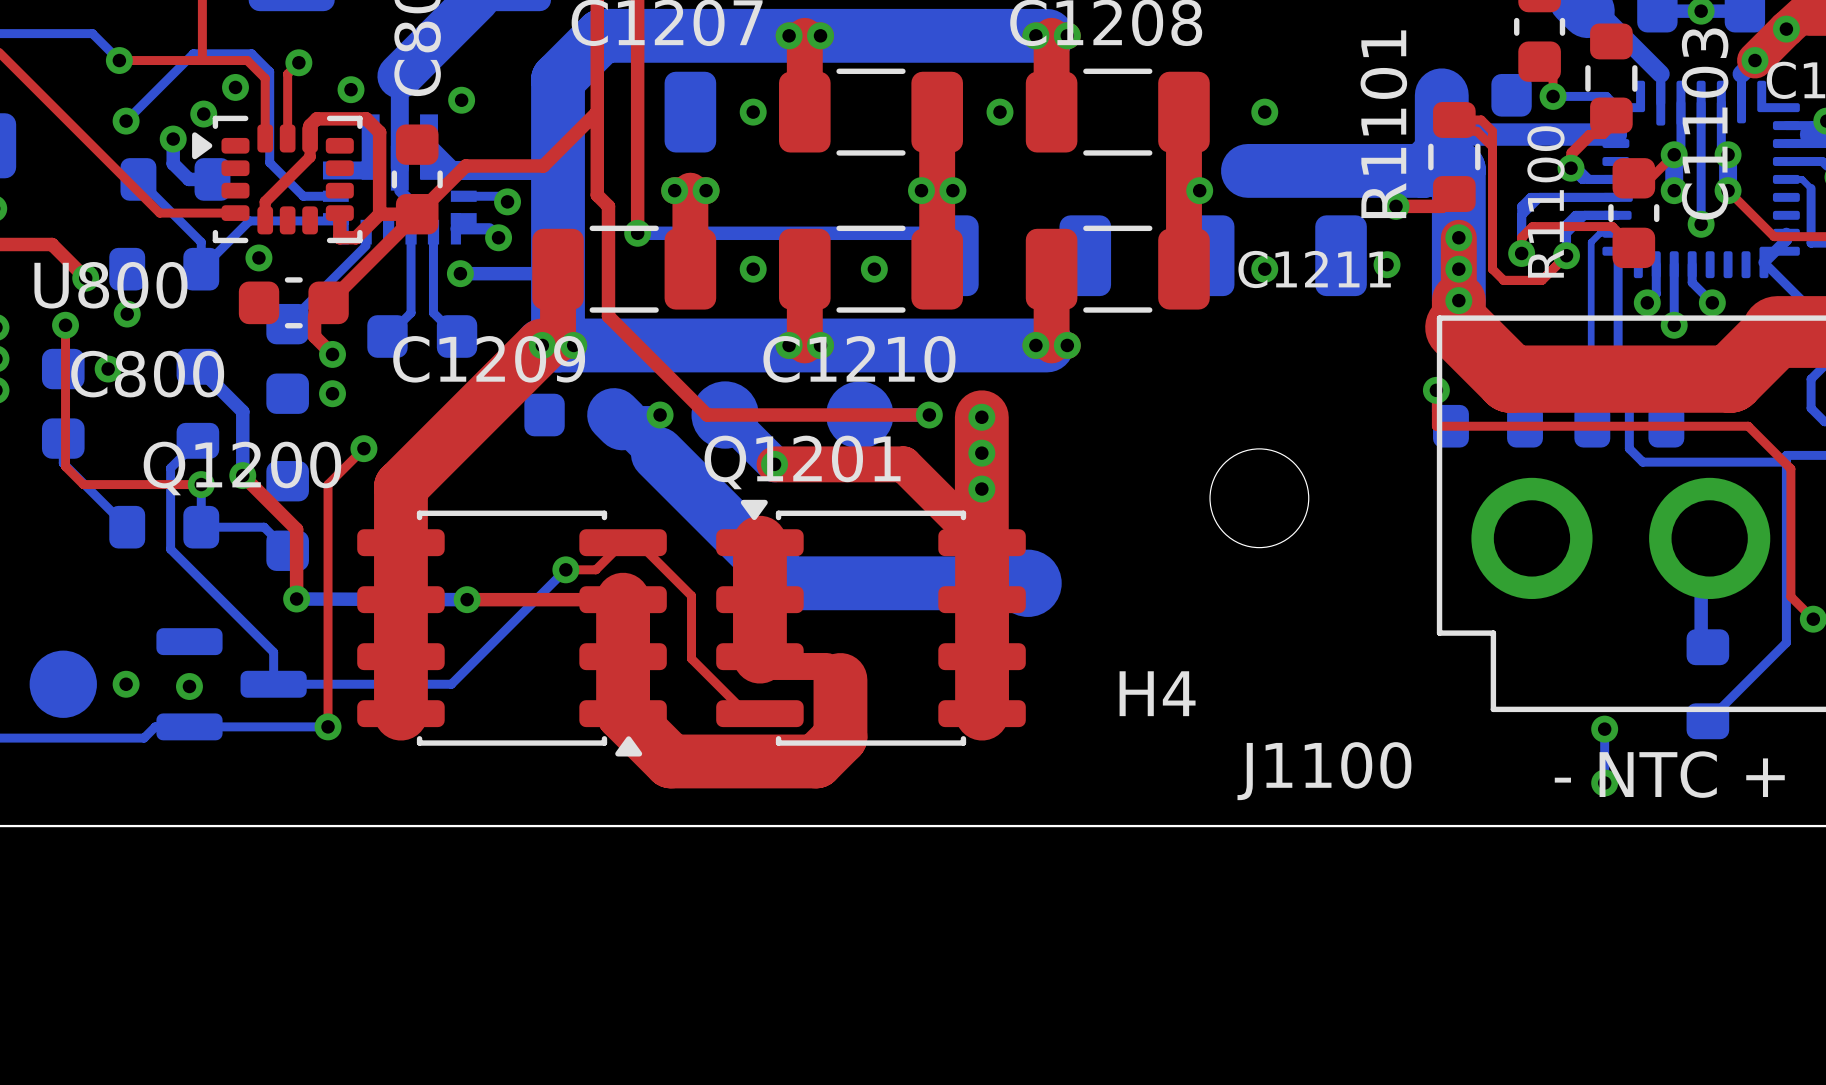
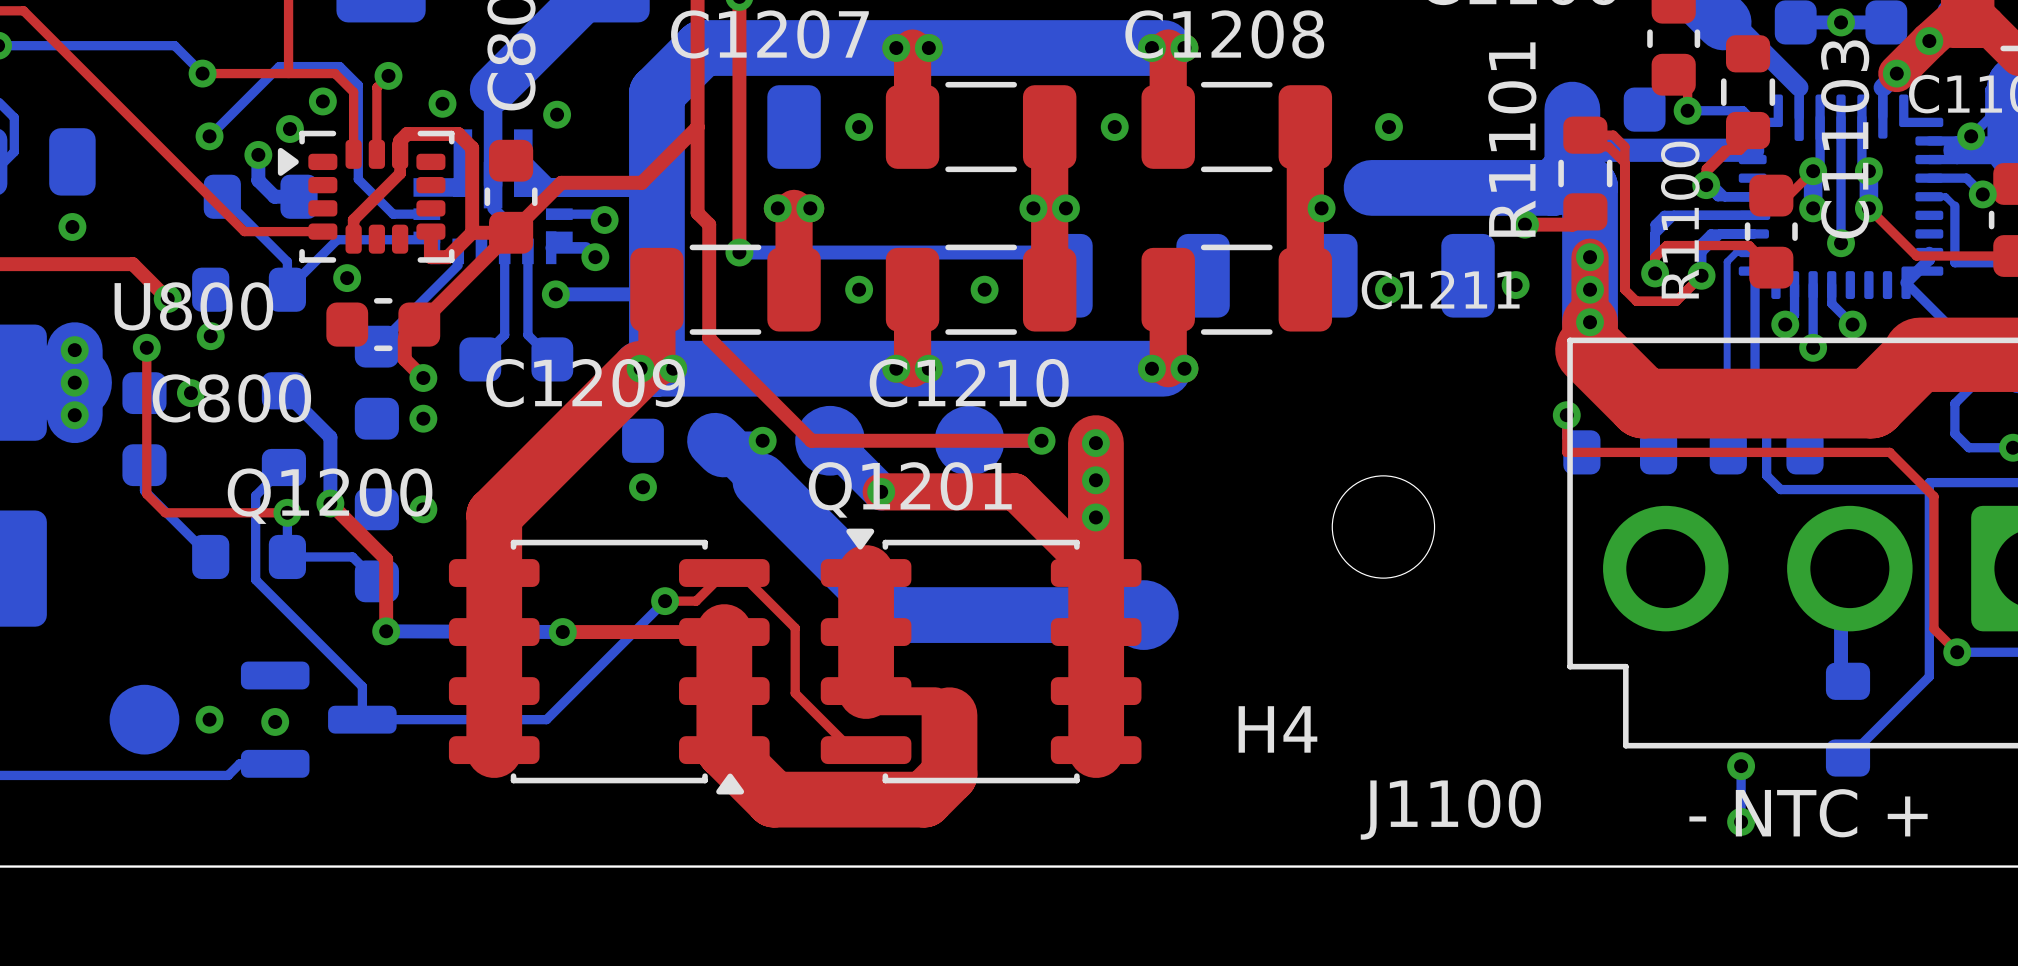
top track: (363, 448) (328, 484) (328, 726) -> none
via position: (363, 448) -> (423, 509)
via: none -> (642, 487)
bottom track: (189, 726) (328, 726) -> none
via: (328, 726) -> none

